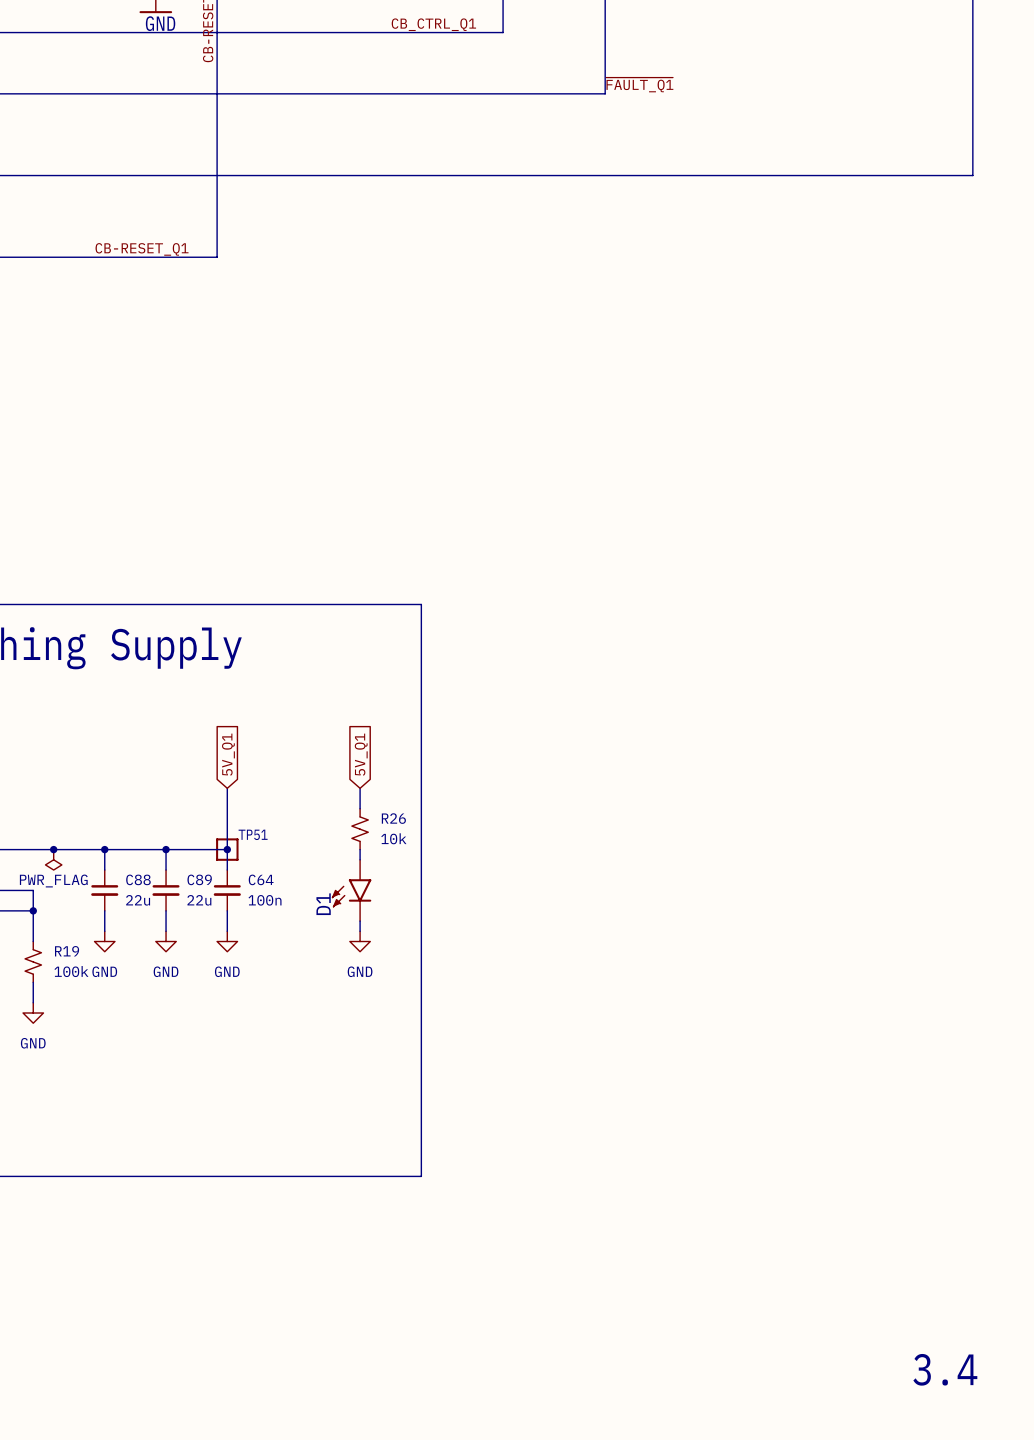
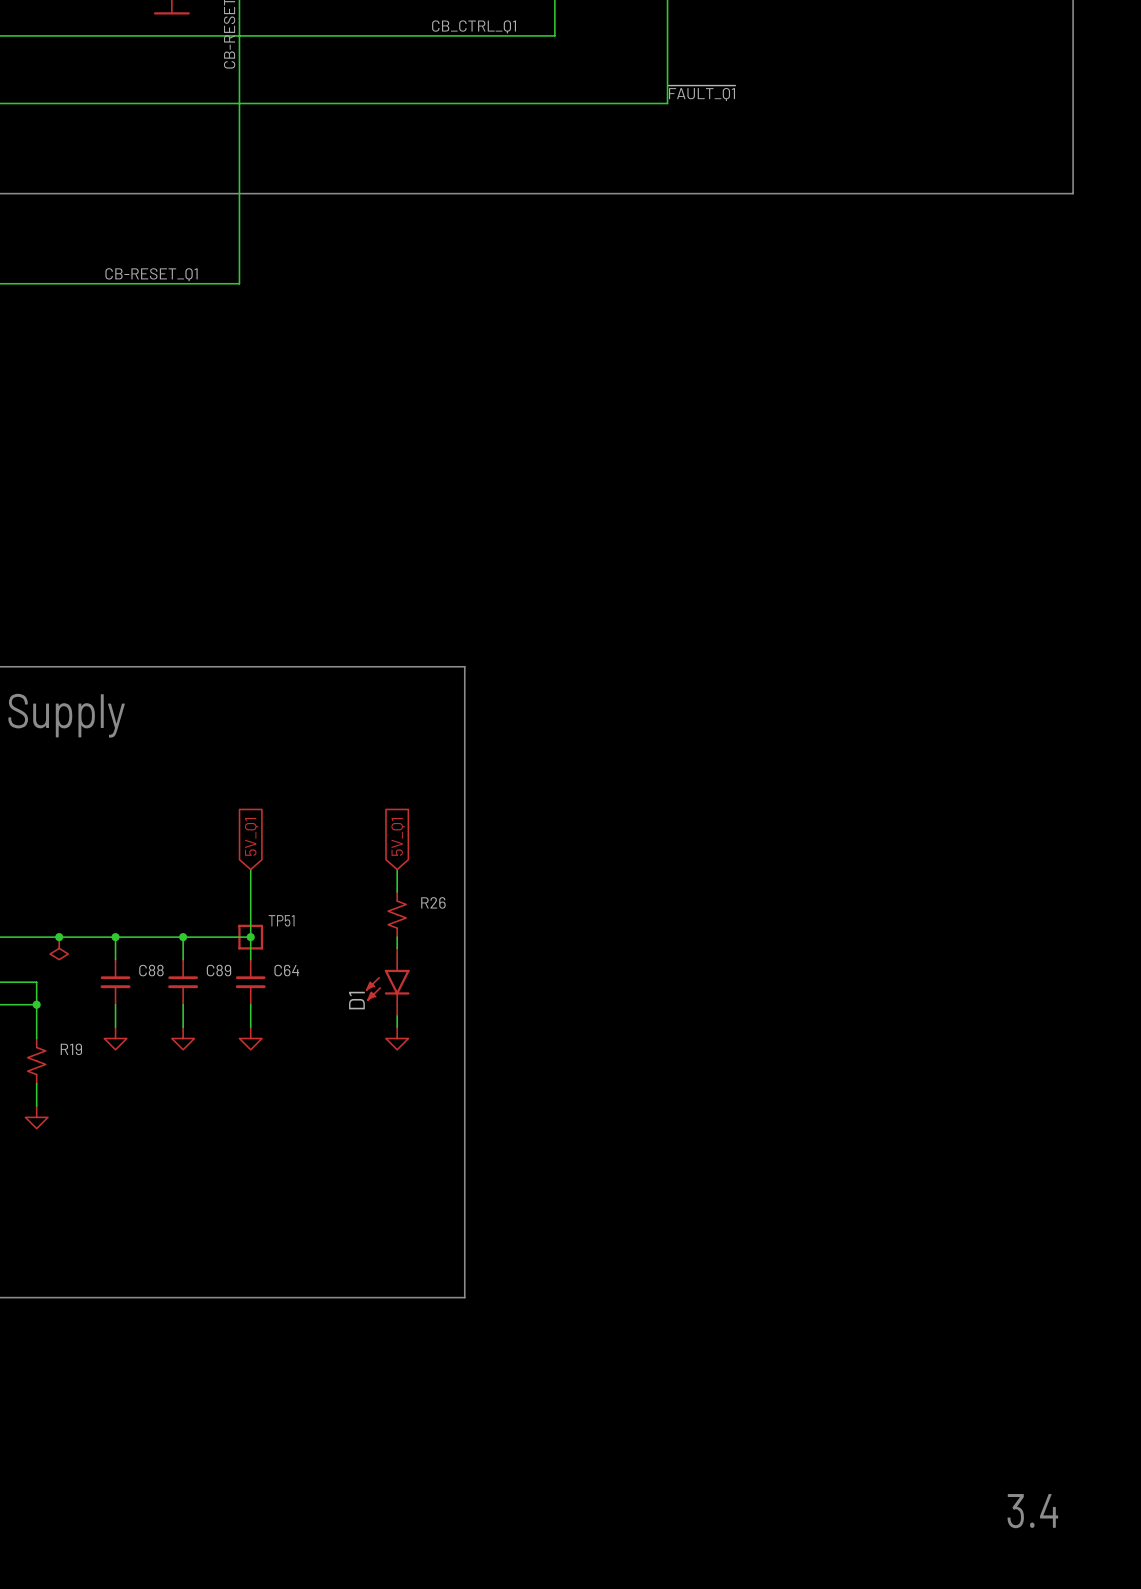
power symbol text: GND (160, 23) -> none
R26 value: 10k (393, 838) -> none
power symbol text: PWR_FLAG (53, 881) -> none
C88 value: 22u (138, 900) -> none
C89 value: 22u (199, 900) -> none
C64 value: 100n (265, 900) -> none
R19 value: 100k (71, 971) -> none
power symbol text: GND (104, 971) -> none
power symbol text: GND (166, 971) -> none
power symbol text: GND (227, 971) -> none
power symbol text: GND (360, 971) -> none
power symbol text: GND (33, 1043) -> none

